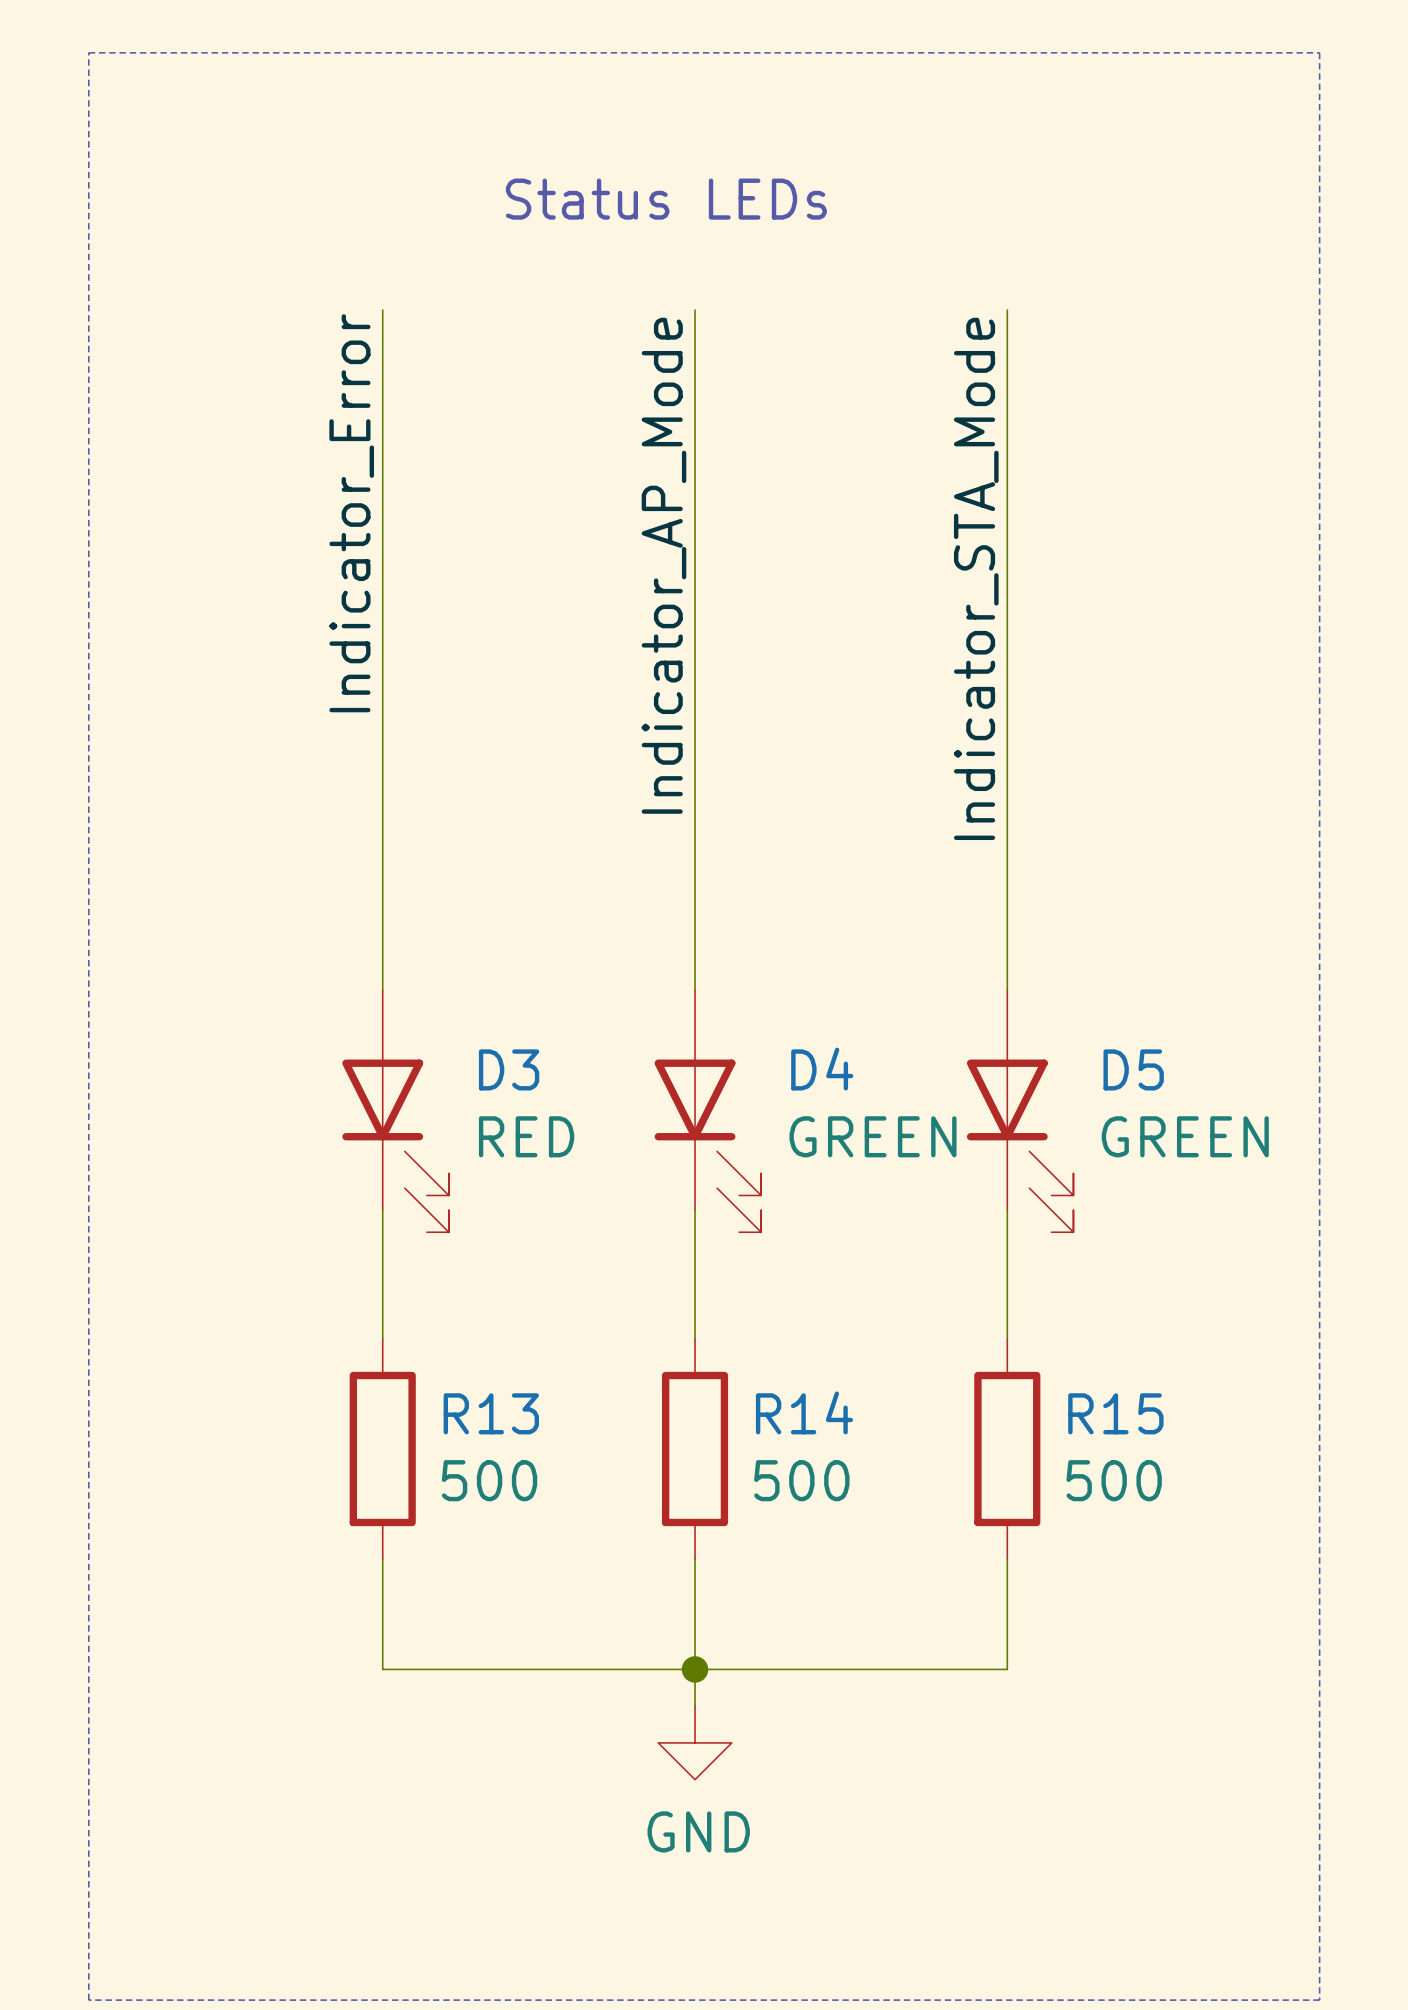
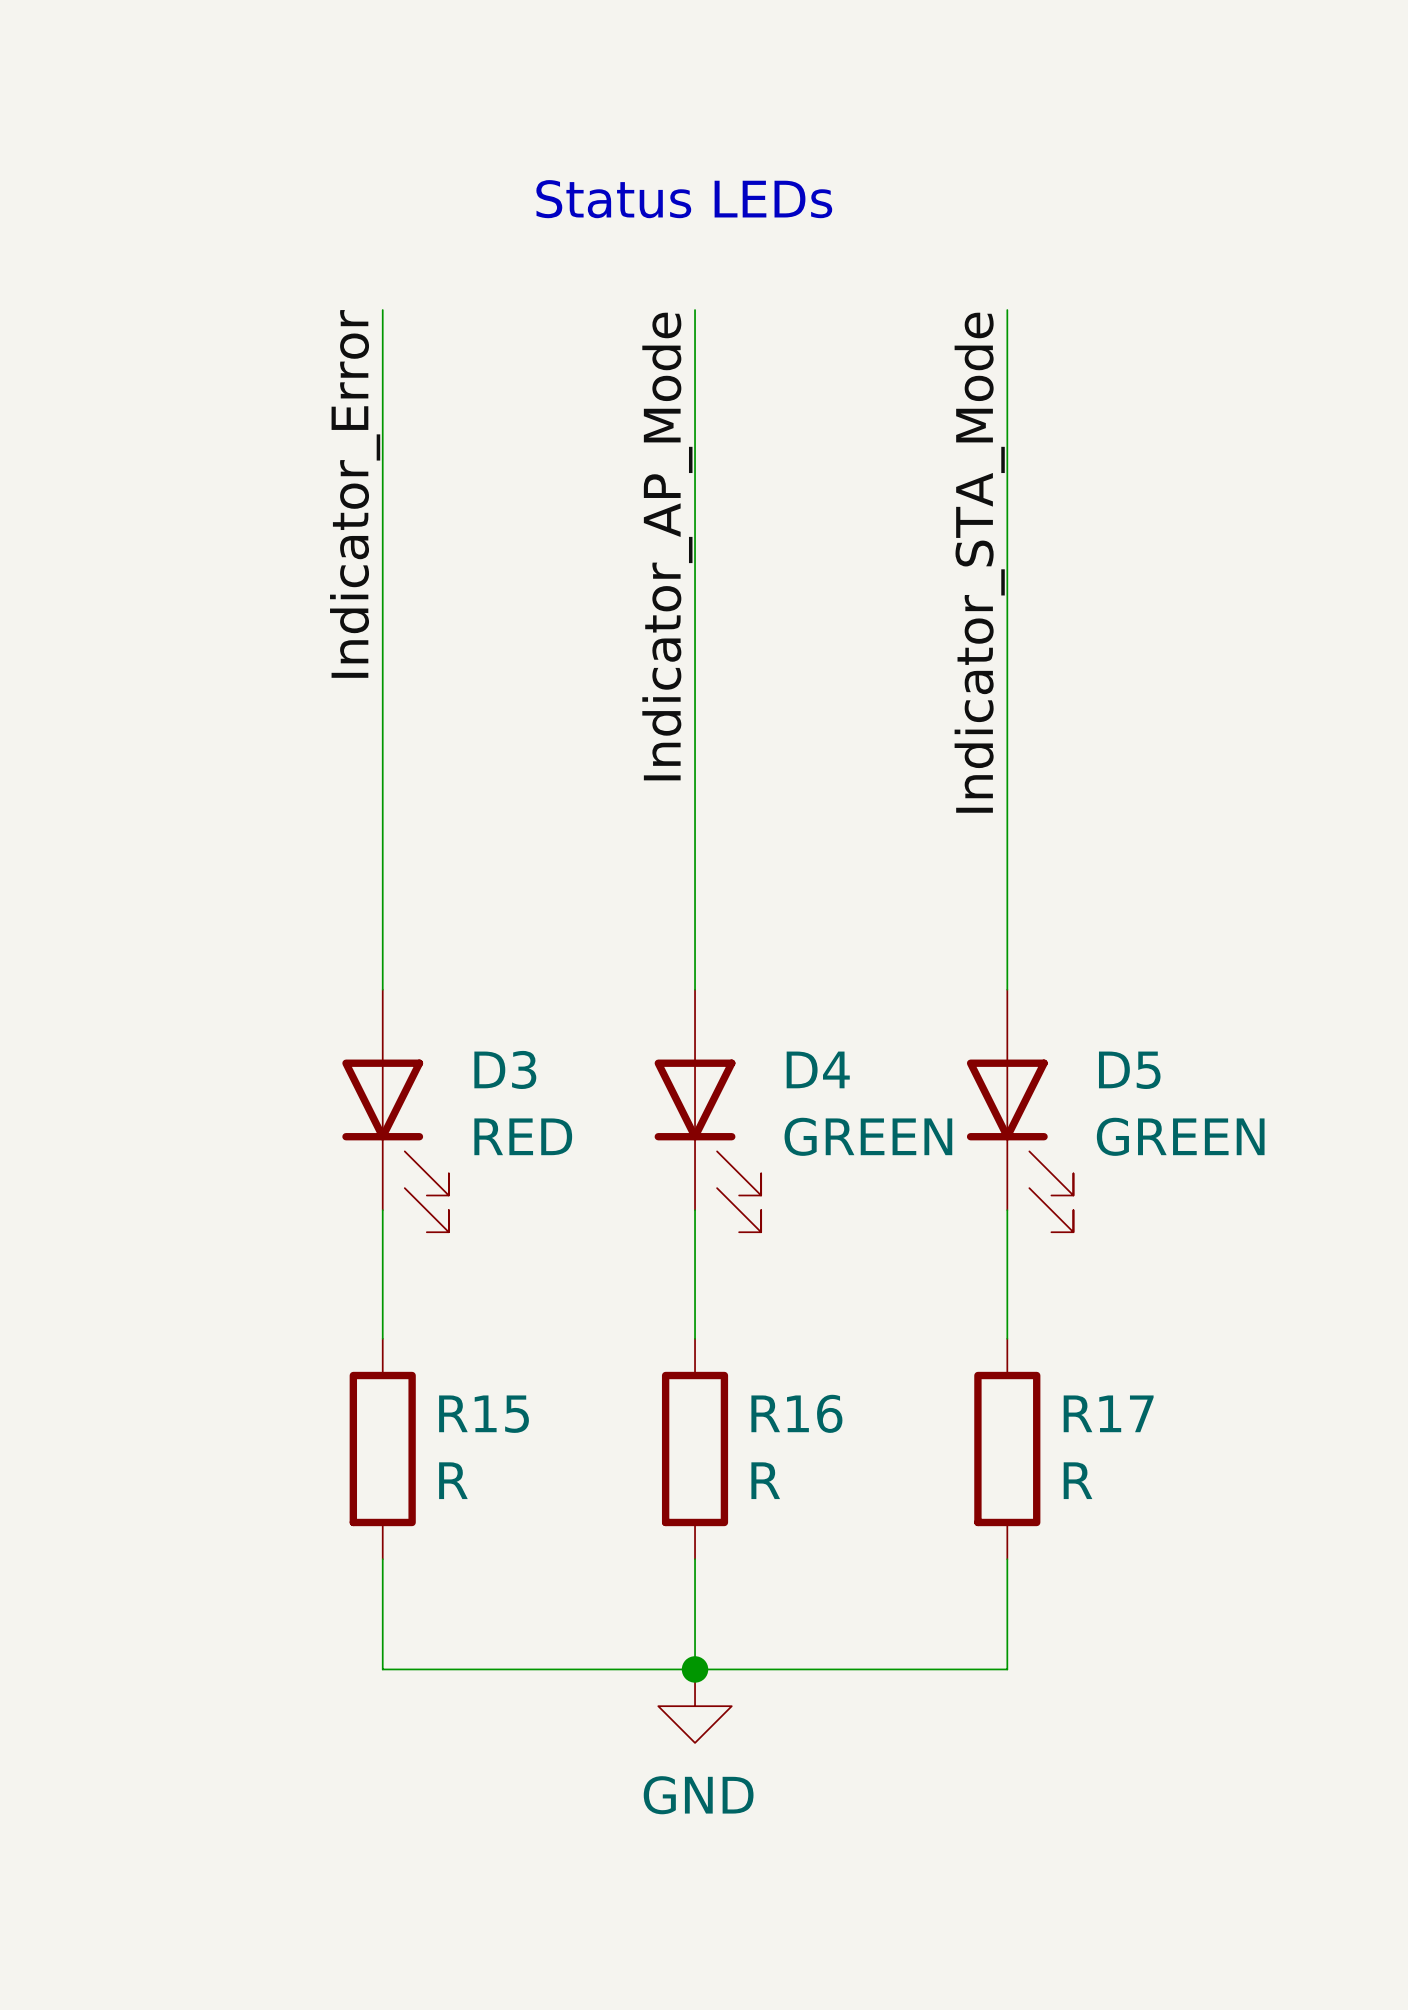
line: (88, 52) (1319, 52) (1319, 2000) (88, 2000) (88, 52) -> none
R14 name: R14 (804, 1412) -> R16 (796, 1413)
R13 name: R13 (491, 1413) -> R15 (484, 1414)
R15 name: R15 (1115, 1413) -> R17 (1108, 1413)
R13 value: 500 (489, 1480) -> R (453, 1480)
R14 value: 500 (801, 1480) -> R (765, 1480)
R15 value: 500 (1114, 1480) -> R (1078, 1480)
power symbol position: GND (695, 1742) -> GND (695, 1706)

